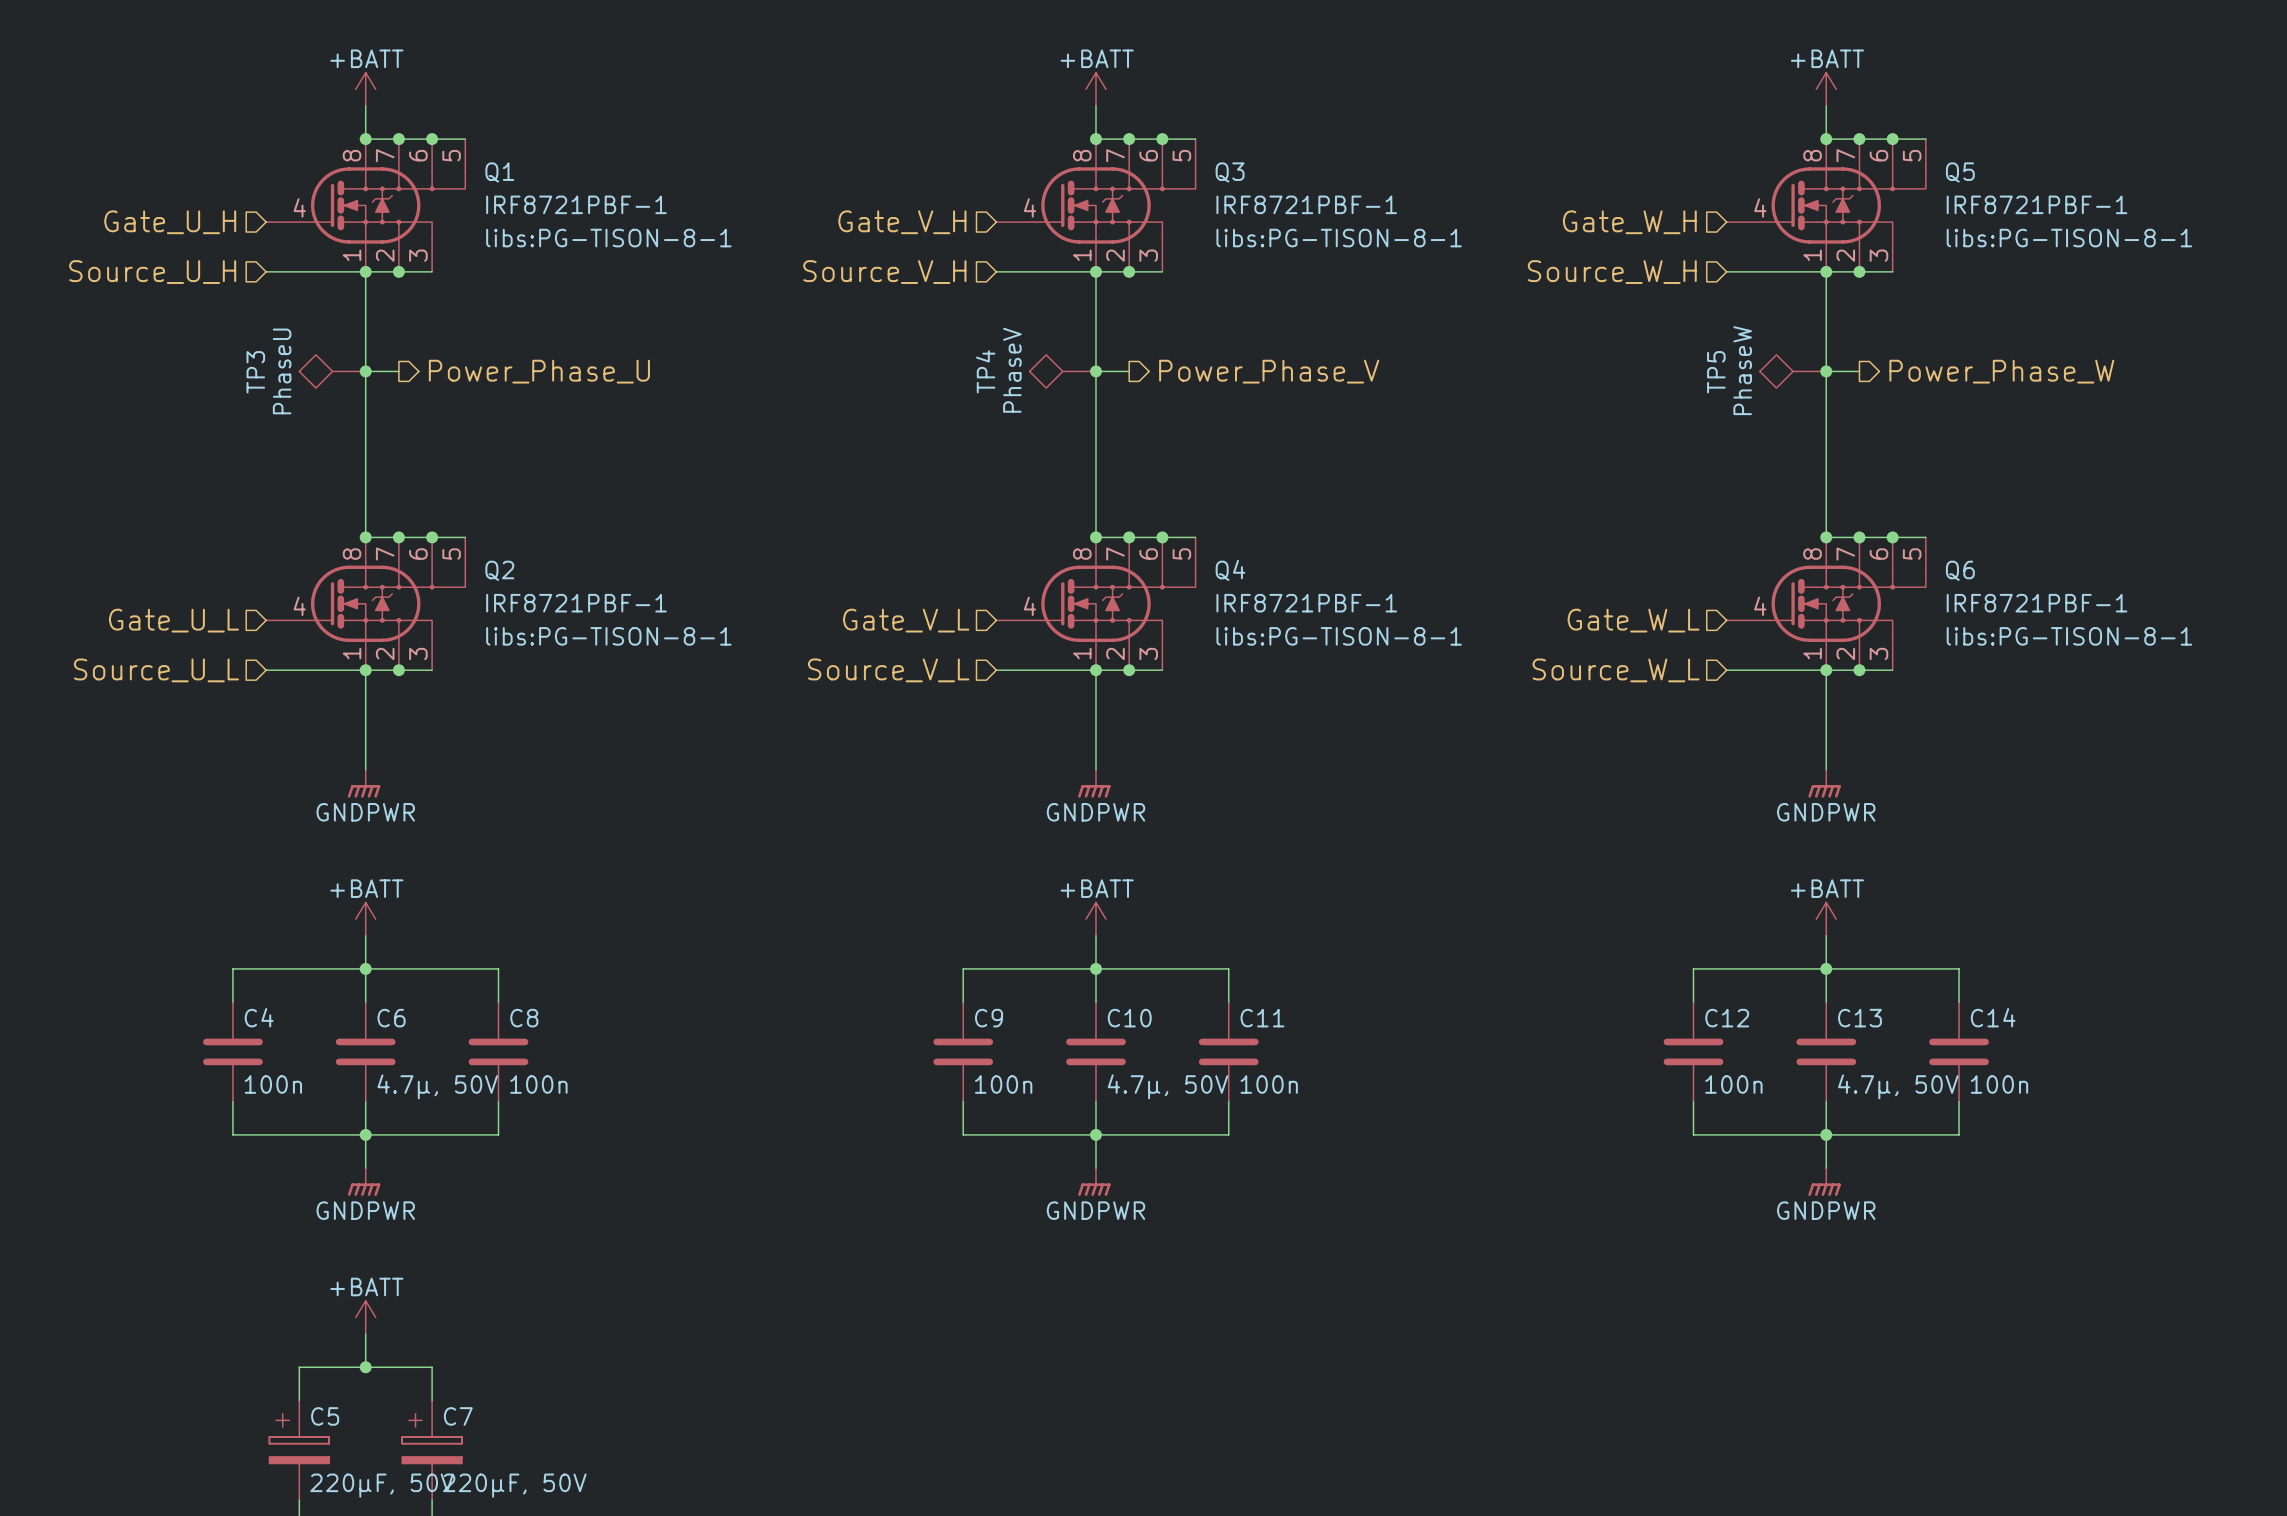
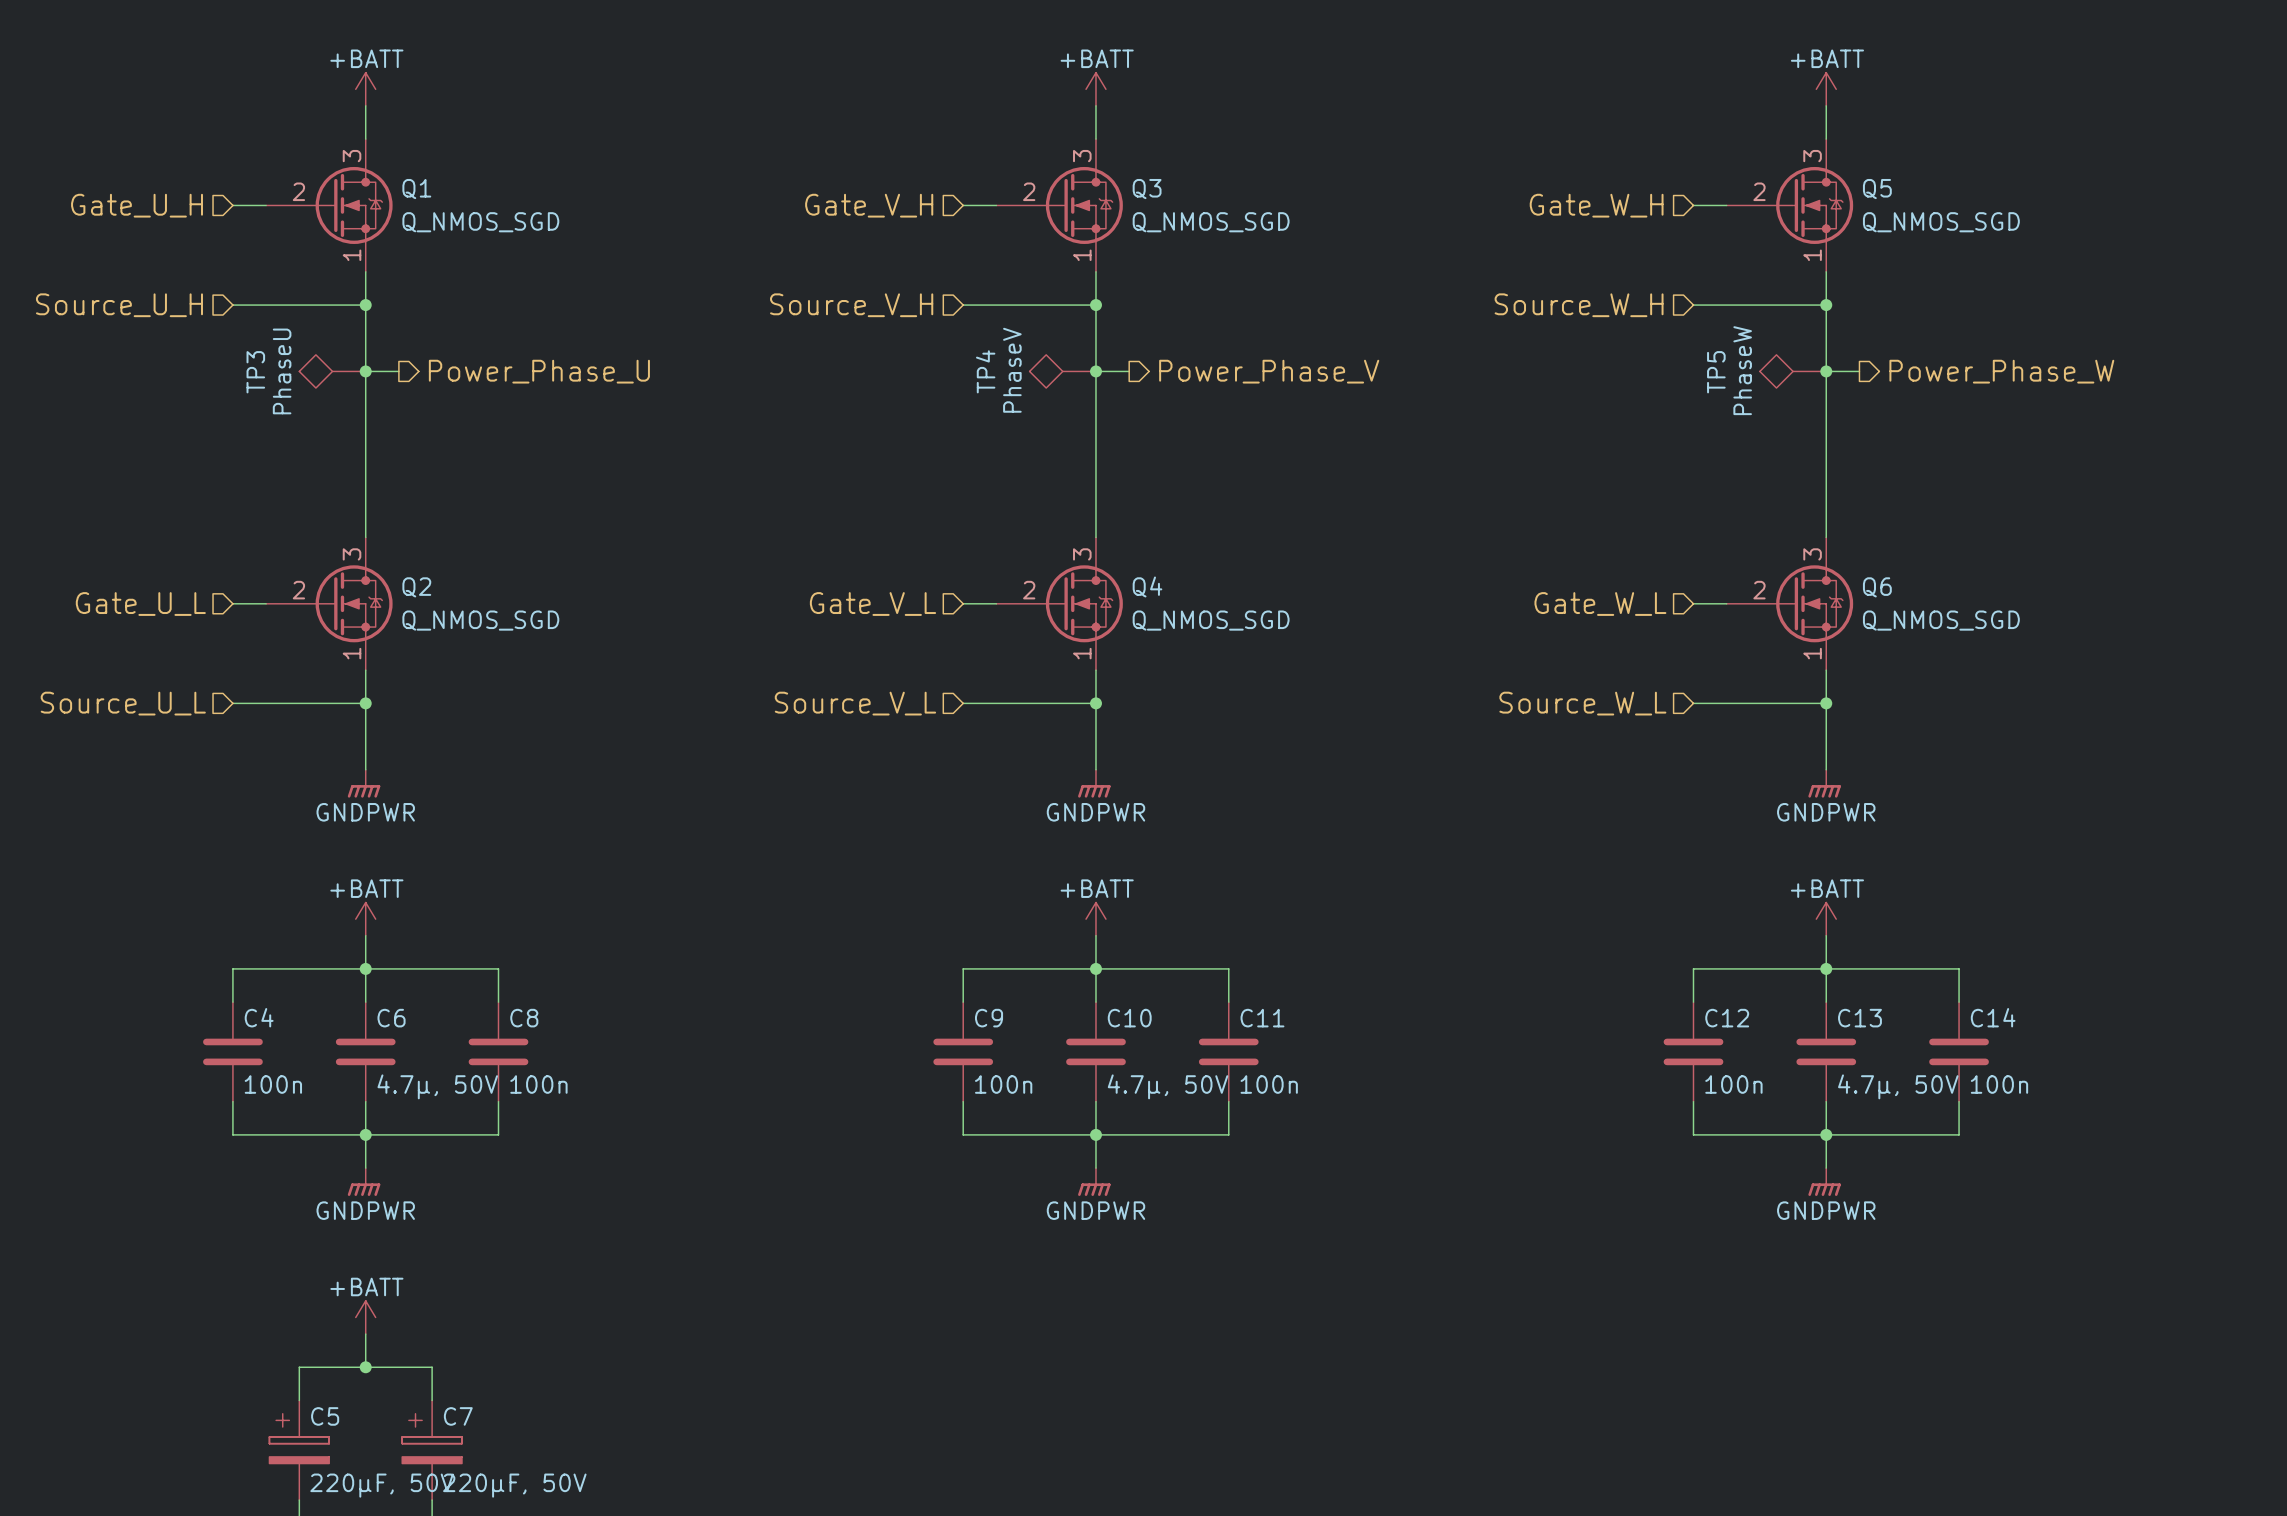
Q1 symbol: [266, 139, 466, 272] -> [266, 139, 393, 272]
wire: (365, 139) (465, 139) -> none
junction: (365, 139) -> none
junction: (398, 139) -> none
junction: (432, 139) -> none
Q3 symbol: [996, 139, 1196, 272] -> [996, 139, 1123, 272]
wire: (1095, 139) (1195, 139) -> none
junction: (1095, 139) -> none
junction: (1129, 139) -> none
junction: (1162, 139) -> none
Q5 symbol: [1726, 139, 1926, 272] -> [1726, 139, 1854, 272]
wire: (1826, 139) (1925, 139) -> none
junction: (1826, 139) -> none
junction: (1859, 139) -> none
junction: (1892, 139) -> none
Q1 name position: Q1 (499, 172) -> Q1 (416, 189)
Q3 name position: Q3 (1230, 172) -> Q3 (1147, 189)
Q5 name position: Q5 (1960, 172) -> Q5 (1877, 189)
Q1 value: IRF8721PBF-1 (576, 204) -> Q_NMOS_SGD (480, 222)
Q3 value: IRF8721PBF-1 (1306, 204) -> Q_NMOS_SGD (1211, 222)
Q5 value: IRF8721PBF-1 (2037, 204) -> Q_NMOS_SGD (1941, 222)
wire: none -> (232, 205) (266, 205)
wire: none -> (963, 205) (996, 205)
wire: none -> (1693, 205) (1726, 205)
hierarchical label position: Gate_U_H (170, 222) -> Gate_U_H (137, 205)
hierarchical label position: Gate_V_H (902, 222) -> Gate_V_H (869, 205)
hierarchical label position: Gate_W_H (1629, 222) -> Gate_W_H (1596, 205)
Q1 text: libs:PG-TISON-8-1 (608, 238) -> none
Q3 text: libs:PG-TISON-8-1 (1339, 238) -> none
Q5 text: libs:PG-TISON-8-1 (2069, 238) -> none
wire: (266, 271) (432, 271) -> none
junction: (365, 271) -> none
junction: (398, 271) -> none
wire: (996, 271) (1162, 271) -> none
junction: (1095, 271) -> none
junction: (1129, 271) -> none
wire: (1726, 271) (1892, 271) -> none
junction: (1826, 271) -> none
junction: (1859, 271) -> none
hierarchical label position: Source_U_H (152, 272) -> Source_U_H (119, 305)
hierarchical label position: Source_V_H (884, 272) -> Source_V_H (851, 305)
hierarchical label position: Source_W_H (1612, 272) -> Source_W_H (1579, 305)
wire: none -> (232, 305) (365, 305)
junction: none -> (365, 305)
wire: none -> (963, 305) (1095, 305)
junction: none -> (1095, 305)
wire: none -> (1693, 305) (1826, 305)
junction: none -> (1826, 305)
Q2 symbol: [266, 537, 466, 671] -> [266, 537, 393, 671]
wire: (365, 537) (465, 537) -> none
junction: (365, 537) -> none
junction: (398, 537) -> none
junction: (432, 537) -> none
Q4 symbol: [996, 537, 1196, 671] -> [996, 537, 1123, 671]
wire: (1095, 537) (1195, 537) -> none
junction: (1095, 537) -> none
junction: (1129, 537) -> none
junction: (1162, 537) -> none
Q6 symbol: [1726, 537, 1926, 671] -> [1726, 537, 1854, 671]
wire: (1826, 537) (1925, 537) -> none
junction: (1826, 537) -> none
junction: (1859, 537) -> none
junction: (1892, 537) -> none
Q2 name position: Q2 (499, 570) -> Q2 (416, 587)
Q4 name position: Q4 (1230, 570) -> Q4 (1147, 586)
Q6 name position: Q6 (1960, 570) -> Q6 (1877, 587)
wire: none -> (232, 603) (266, 603)
Q2 value: IRF8721PBF-1 (576, 603) -> Q_NMOS_SGD (480, 620)
wire: none -> (963, 603) (996, 603)
Q4 value: IRF8721PBF-1 (1306, 603) -> Q_NMOS_SGD (1211, 620)
wire: none -> (1693, 603) (1726, 603)
Q6 value: IRF8721PBF-1 (2037, 603) -> Q_NMOS_SGD (1941, 620)
hierarchical label position: Gate_U_L (174, 620) -> Gate_U_L (140, 604)
hierarchical label position: Gate_V_L (906, 620) -> Gate_V_L (872, 604)
hierarchical label position: Gate_W_L (1633, 620) -> Gate_W_L (1600, 604)
Q2 text: libs:PG-TISON-8-1 (608, 636) -> none
Q4 text: libs:PG-TISON-8-1 (1339, 636) -> none
Q6 text: libs:PG-TISON-8-1 (2069, 636) -> none
hierarchical label position: Source_U_L (156, 670) -> Source_U_L (123, 703)
wire: (266, 670) (432, 670) -> none
junction: (365, 670) -> none
junction: (398, 670) -> none
hierarchical label position: Source_V_L (888, 670) -> Source_V_L (855, 703)
wire: (996, 670) (1162, 670) -> none
junction: (1095, 670) -> none
junction: (1129, 670) -> none
hierarchical label position: Source_W_L (1616, 670) -> Source_W_L (1582, 703)
wire: (1726, 670) (1892, 670) -> none
junction: (1826, 670) -> none
junction: (1859, 670) -> none
wire: none -> (232, 703) (365, 703)
junction: none -> (365, 703)
wire: none -> (963, 703) (1095, 703)
junction: none -> (1095, 703)
wire: none -> (1693, 703) (1826, 703)
junction: none -> (1826, 703)

